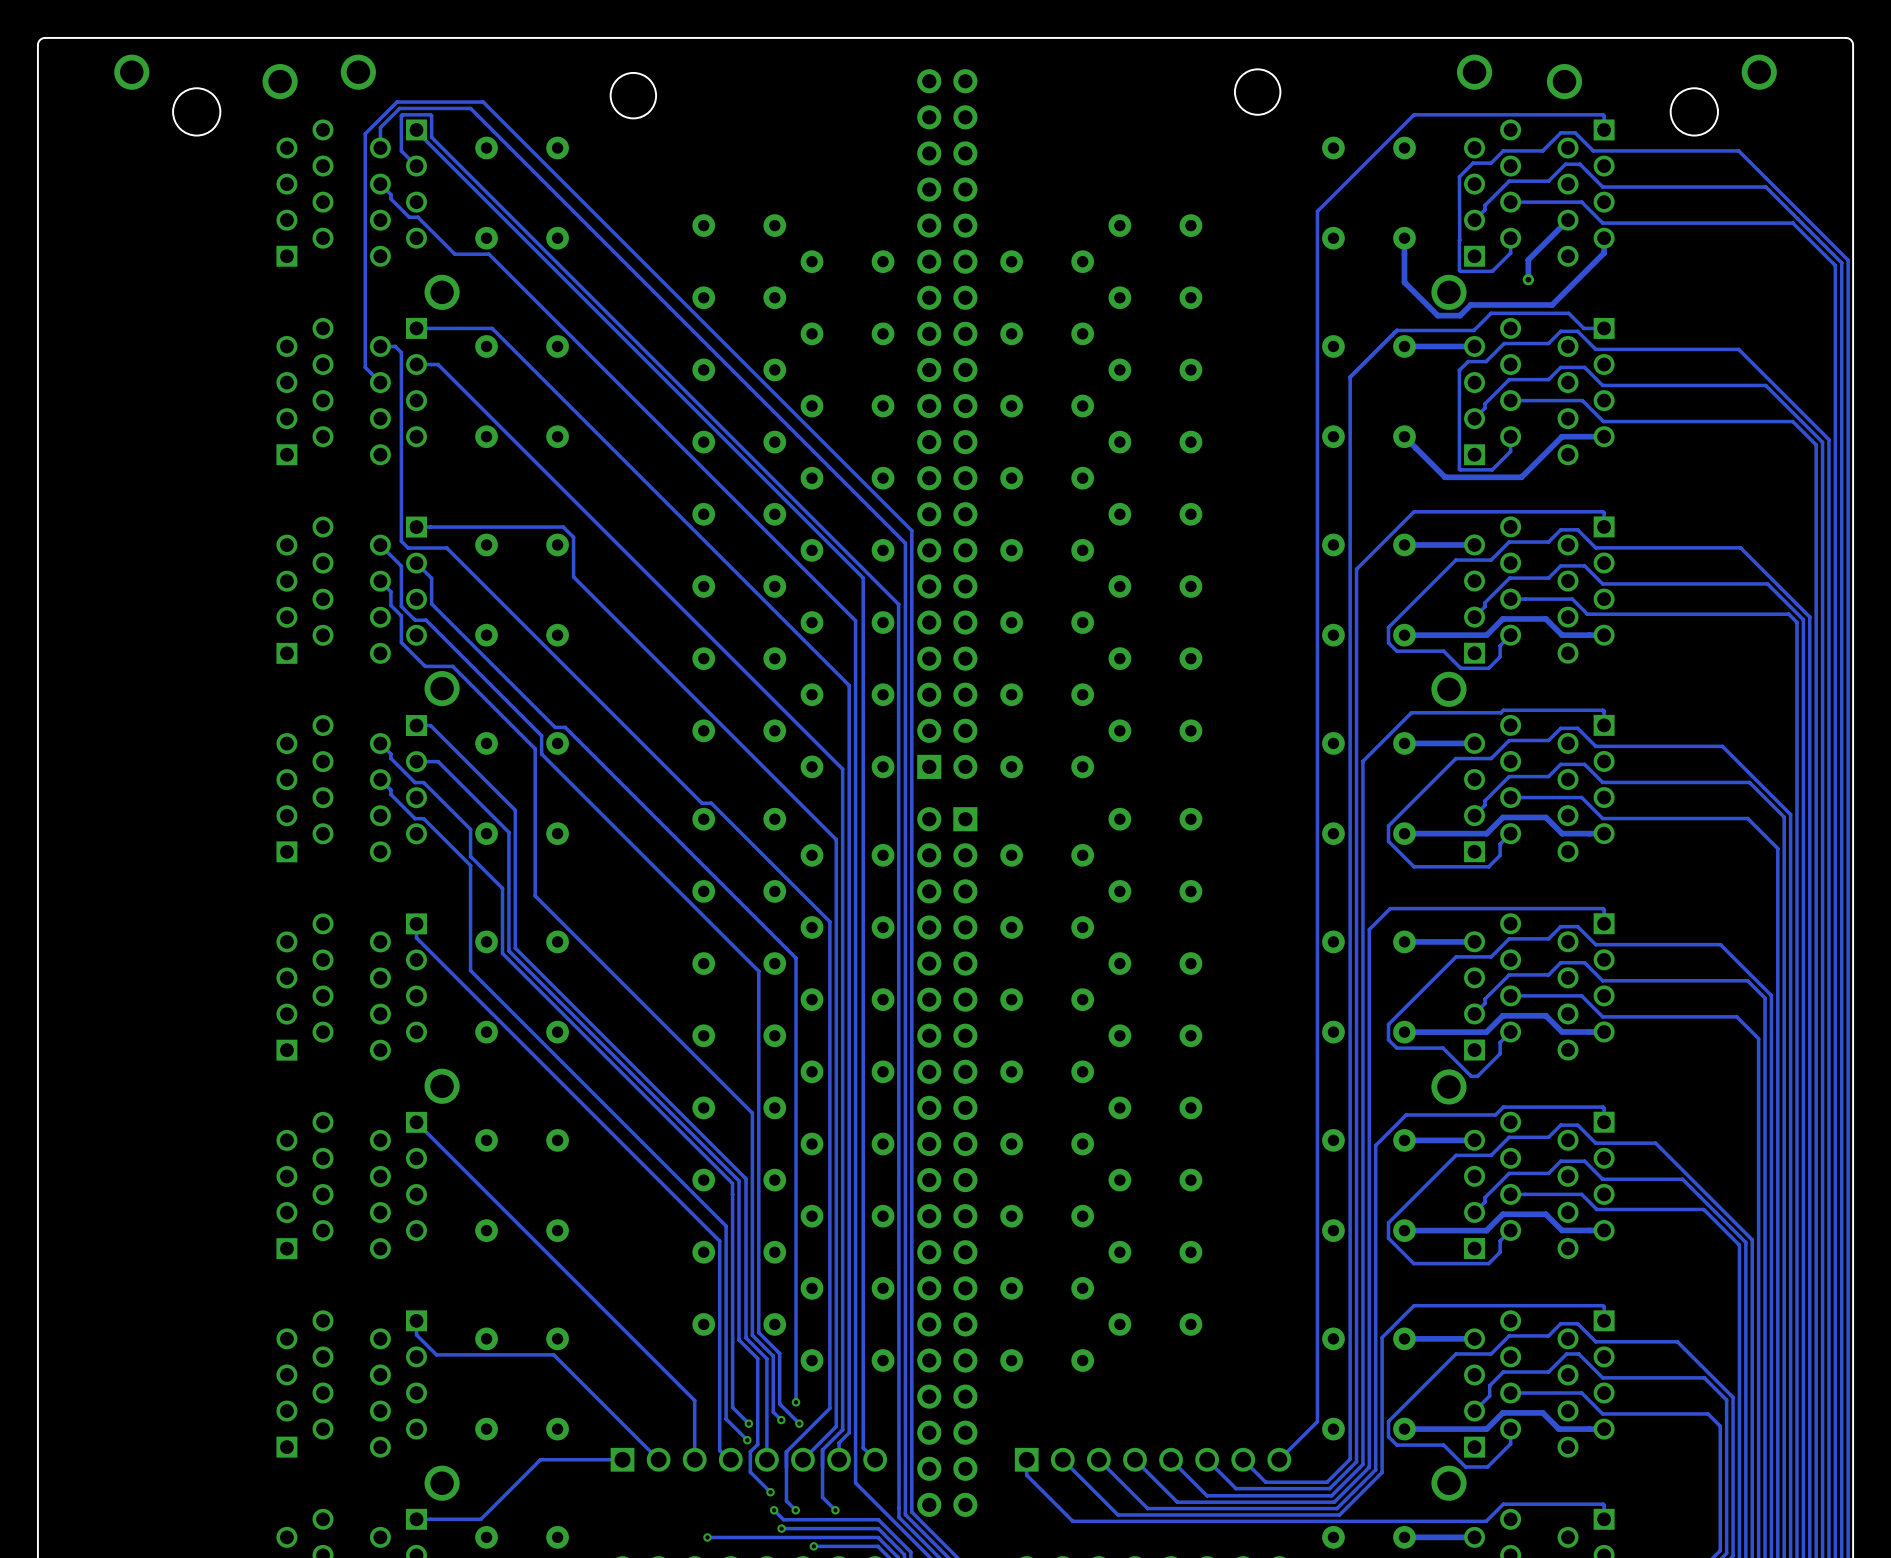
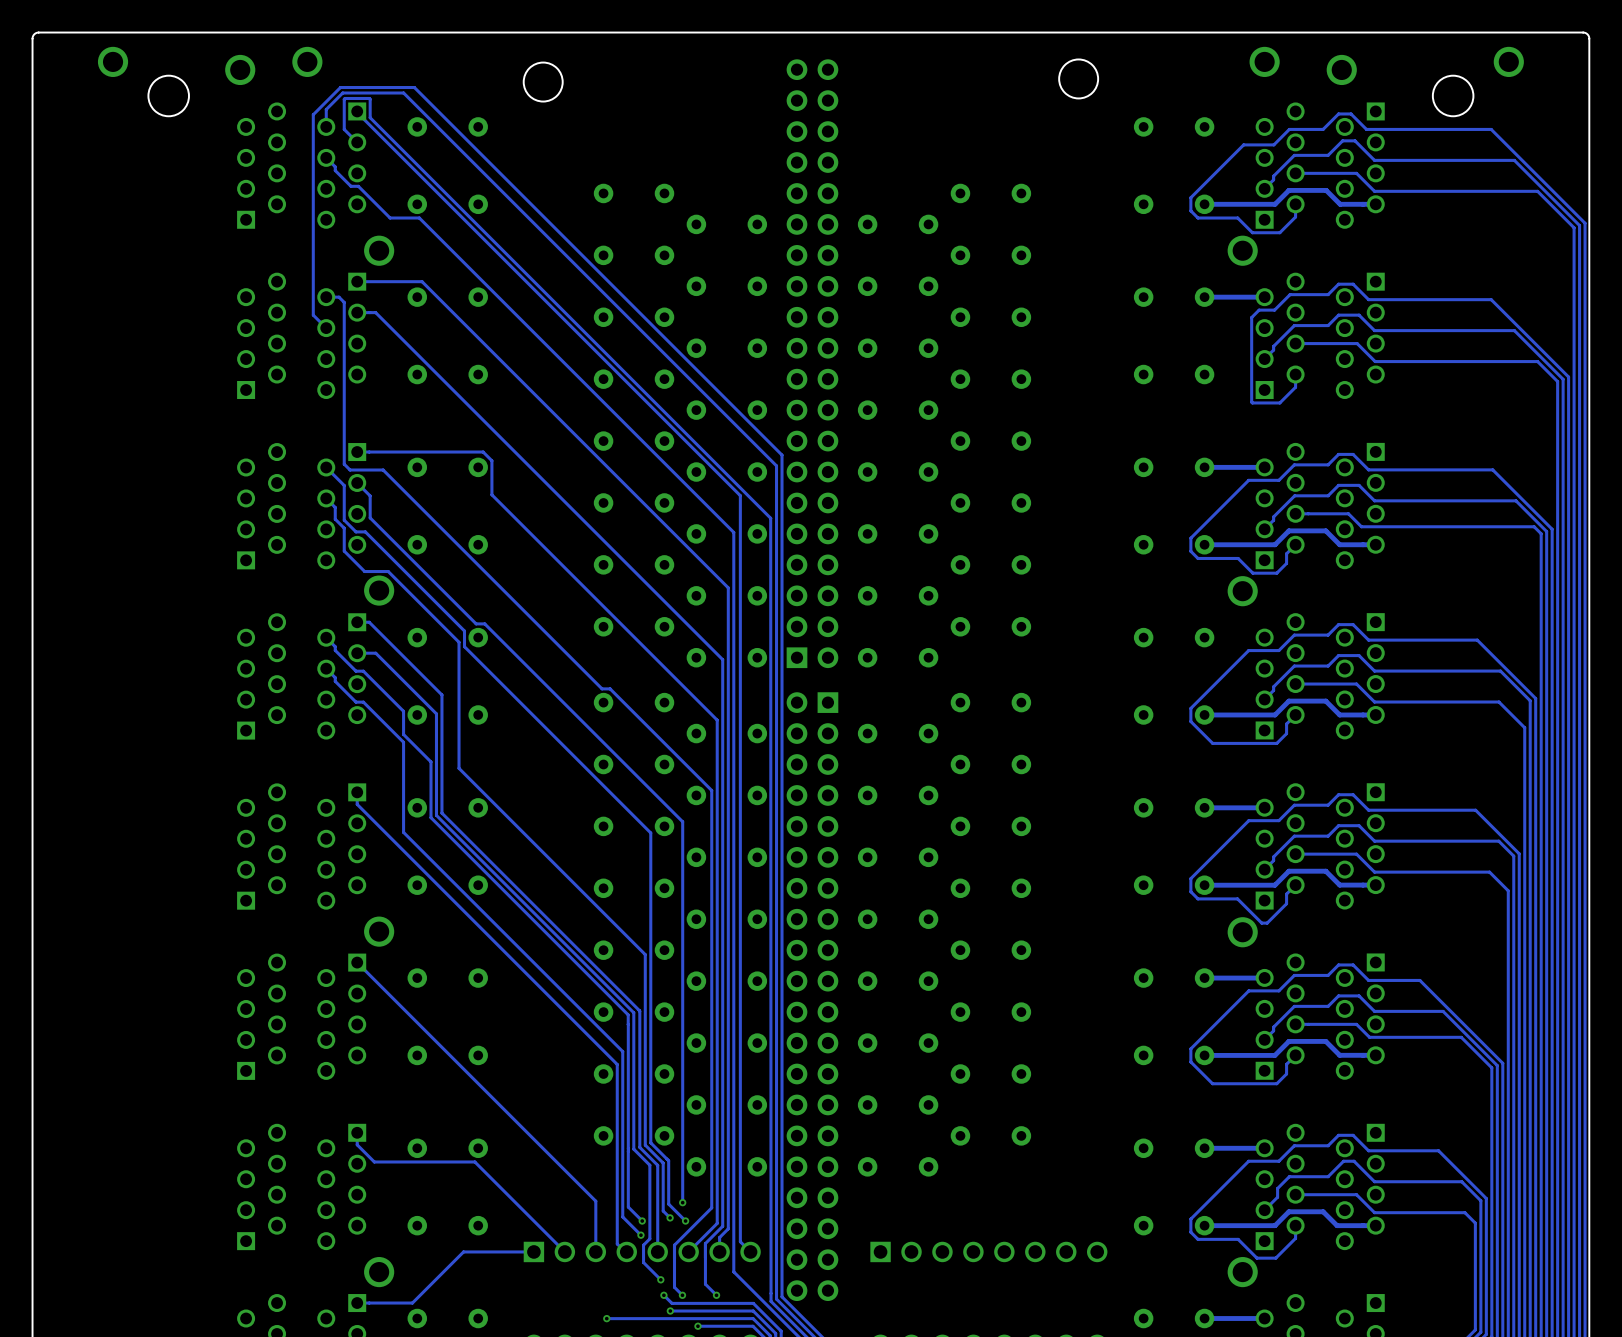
track: (1604, 129) (1603, 114) (1414, 114) (1317, 211) (1317, 1421) (1279, 1459) -> none
track: (1491, 163) (1473, 163) (1459, 176) (1459, 270) -> (1278, 139) (1273, 144) (1243, 144) (1190, 197) (1190, 210) (1197, 218) (1237, 218) (1251, 231)
track: (1568, 220) (1528, 259) (1528, 279) -> none
track: (1604, 238) (1604, 253) (1552, 304) (1470, 304) (1460, 315) (1437, 315) (1404, 282) (1404, 238) -> (1375, 204) (1340, 204) (1326, 190) (1288, 190) (1275, 204) (1204, 204)
via: (1528, 279) -> none
track: (1604, 328) (1583, 328) (1568, 313) (1491, 313) (1473, 330) (1396, 330) -> none
track: (1397, 330) (1350, 377) (1350, 1459) (1327, 1482) (1265, 1482) (1243, 1459) -> none
track: (1604, 436) (1562, 436) (1521, 477) (1445, 477) (1404, 436) -> none
track: (1604, 526) (1603, 511) (1414, 511) (1356, 569) (1356, 1461) (1329, 1488) (1236, 1488) (1207, 1459) -> none
track: (1604, 725) (1603, 710) (1411, 712) (1362, 761) (1362, 1464) (1331, 1495) (1207, 1495) (1171, 1459) -> none
track: (1474, 743) (1404, 743) -> none
track: (1604, 923) (1603, 908) (1390, 908) (1369, 929) (1369, 1467) (1334, 1502) (1177, 1502) (1134, 1459) -> none
track: (1604, 1122) (1603, 1107) (1503, 1107) (1495, 1114) (1406, 1114) (1375, 1145) (1375, 1469) (1336, 1508) (1147, 1508) (1098, 1459) -> none
track: (1604, 1320) (1603, 1305) (1414, 1305) (1382, 1337) (1382, 1472) (1339, 1514) (1118, 1514) (1062, 1459) -> none
track: (1026, 1459) (1026, 1475) (1072, 1521) (1486, 1521) (1503, 1504) (1603, 1504) (1604, 1519) -> none

